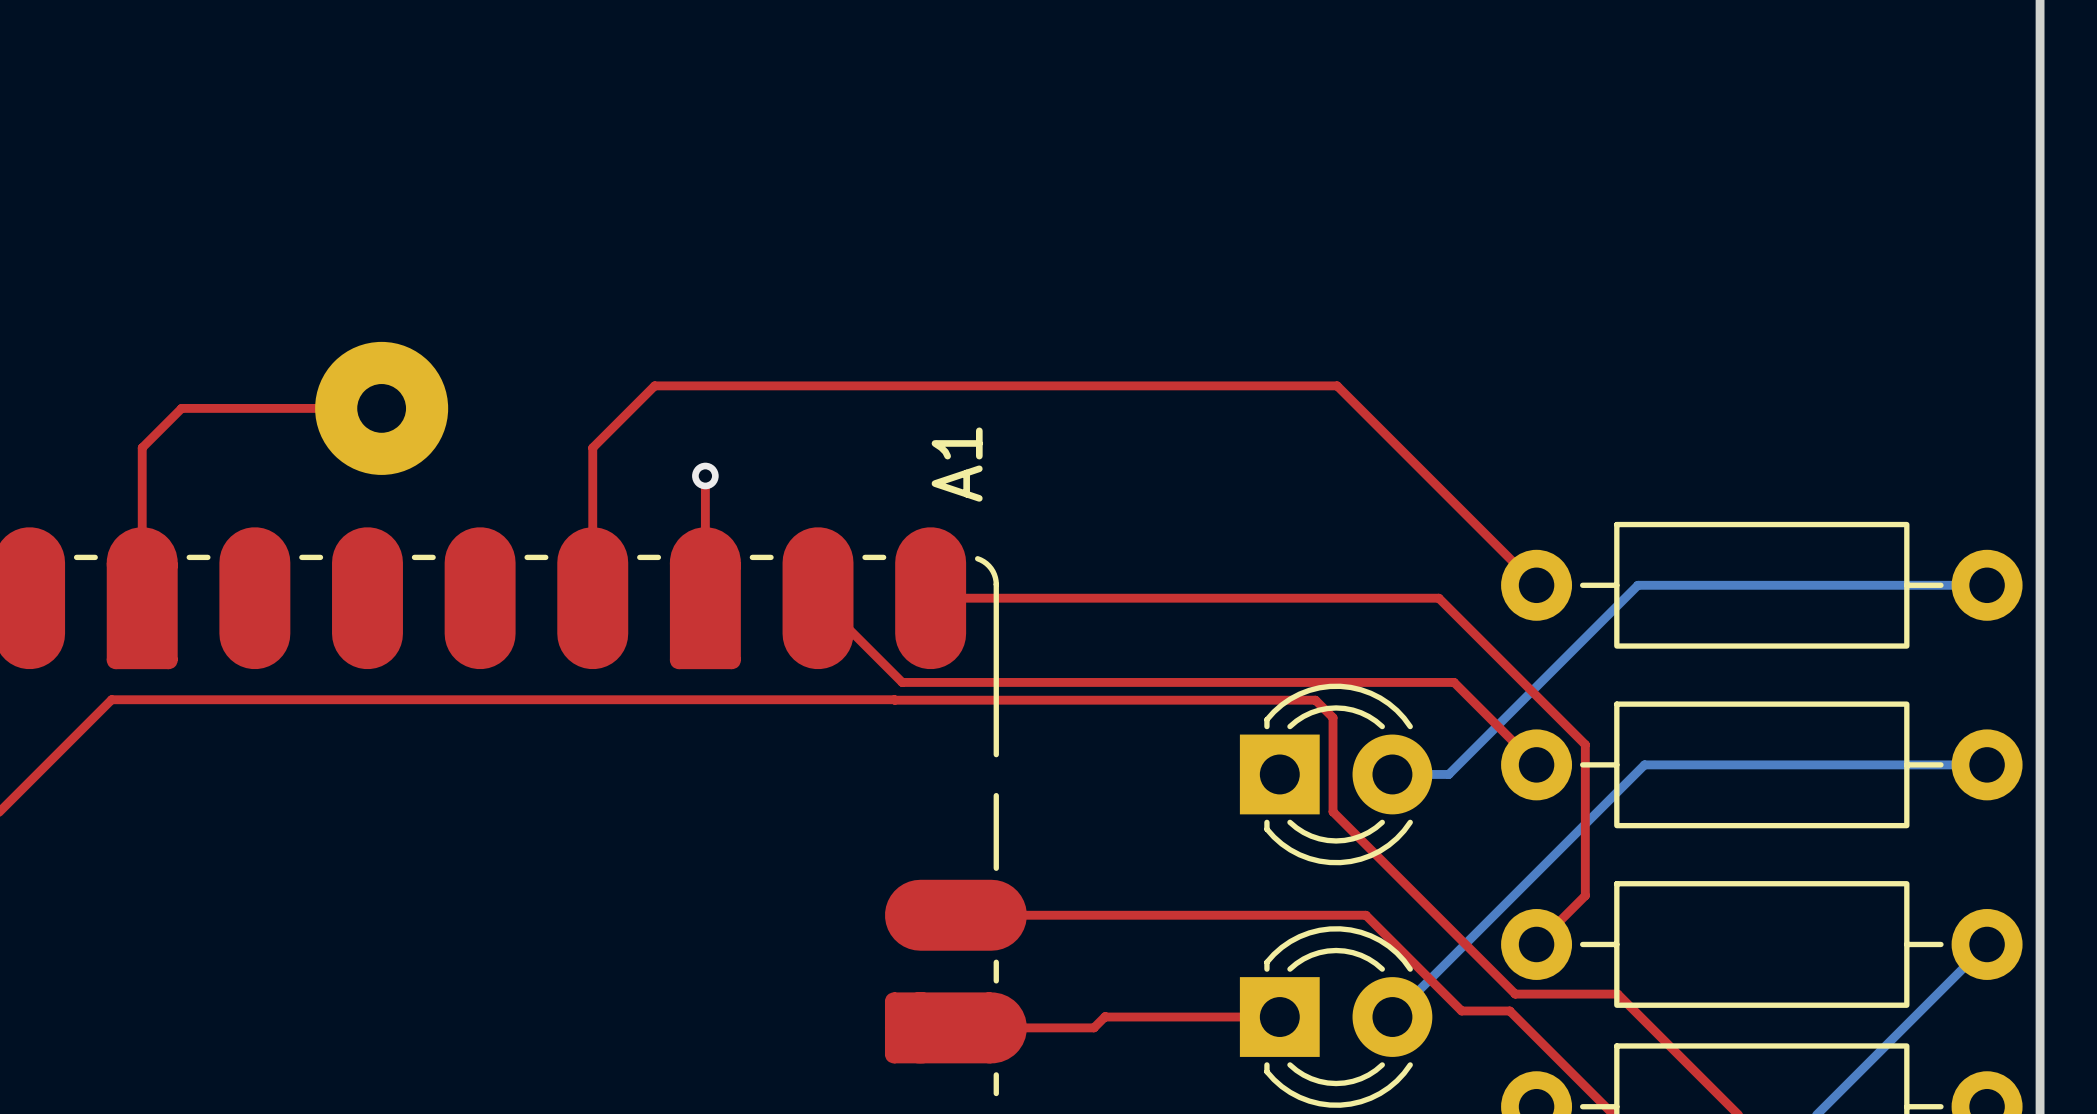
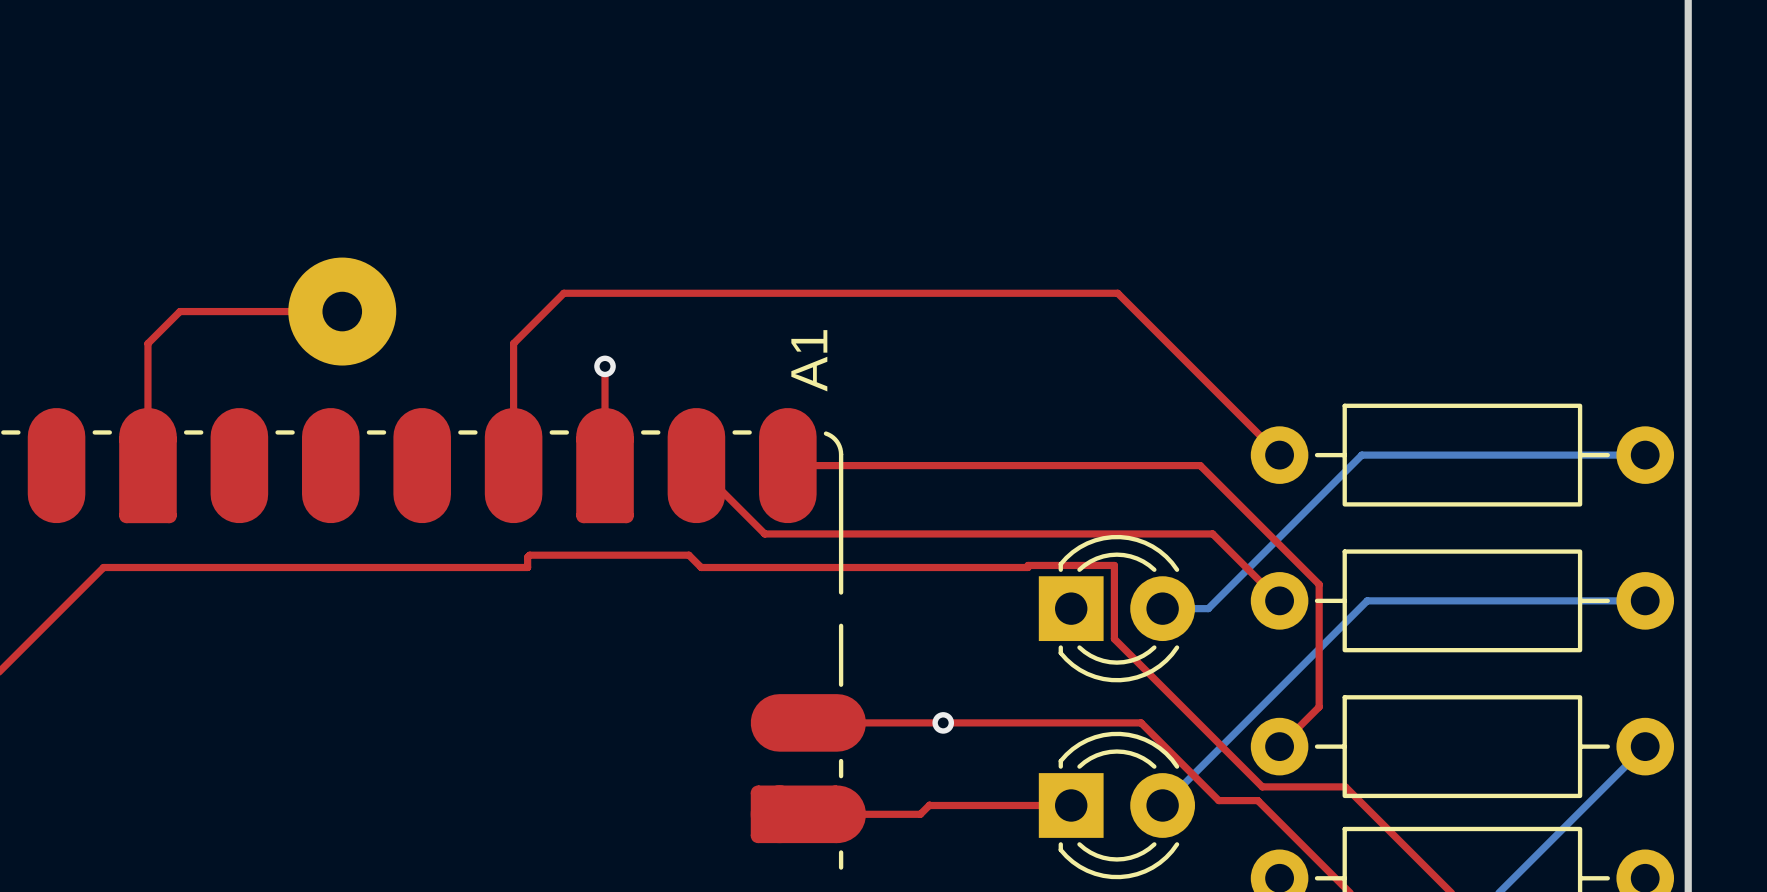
top track: (894, 699) (111, 699) (87, 723) -> (1114, 565) (1028, 565) (1028, 567) (701, 567) (688, 555) (529, 555) (527, 557) (527, 567) (103, 567)
top track: (894, 700) (1315, 700) (1333, 717) (1333, 721) -> none
via: none -> (943, 722)

